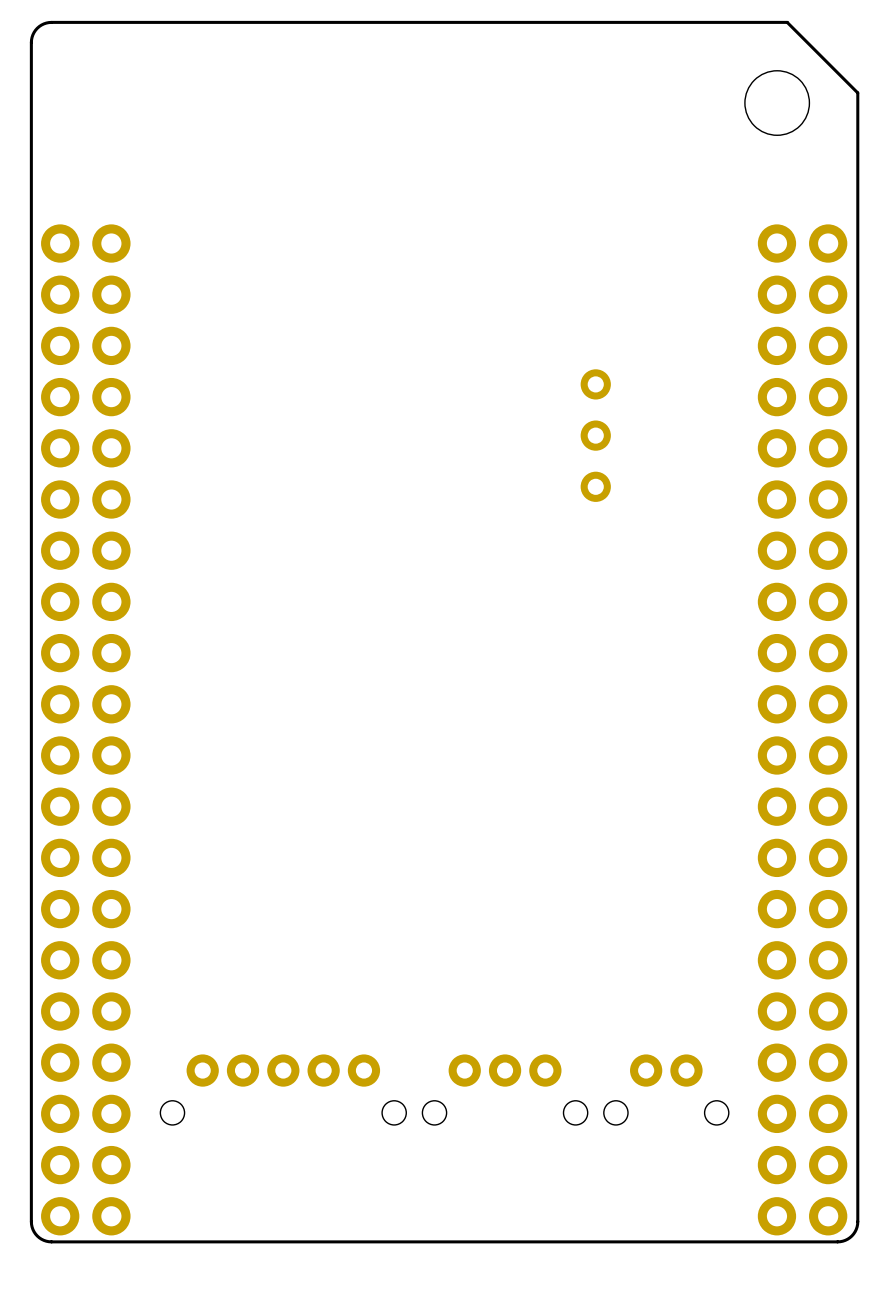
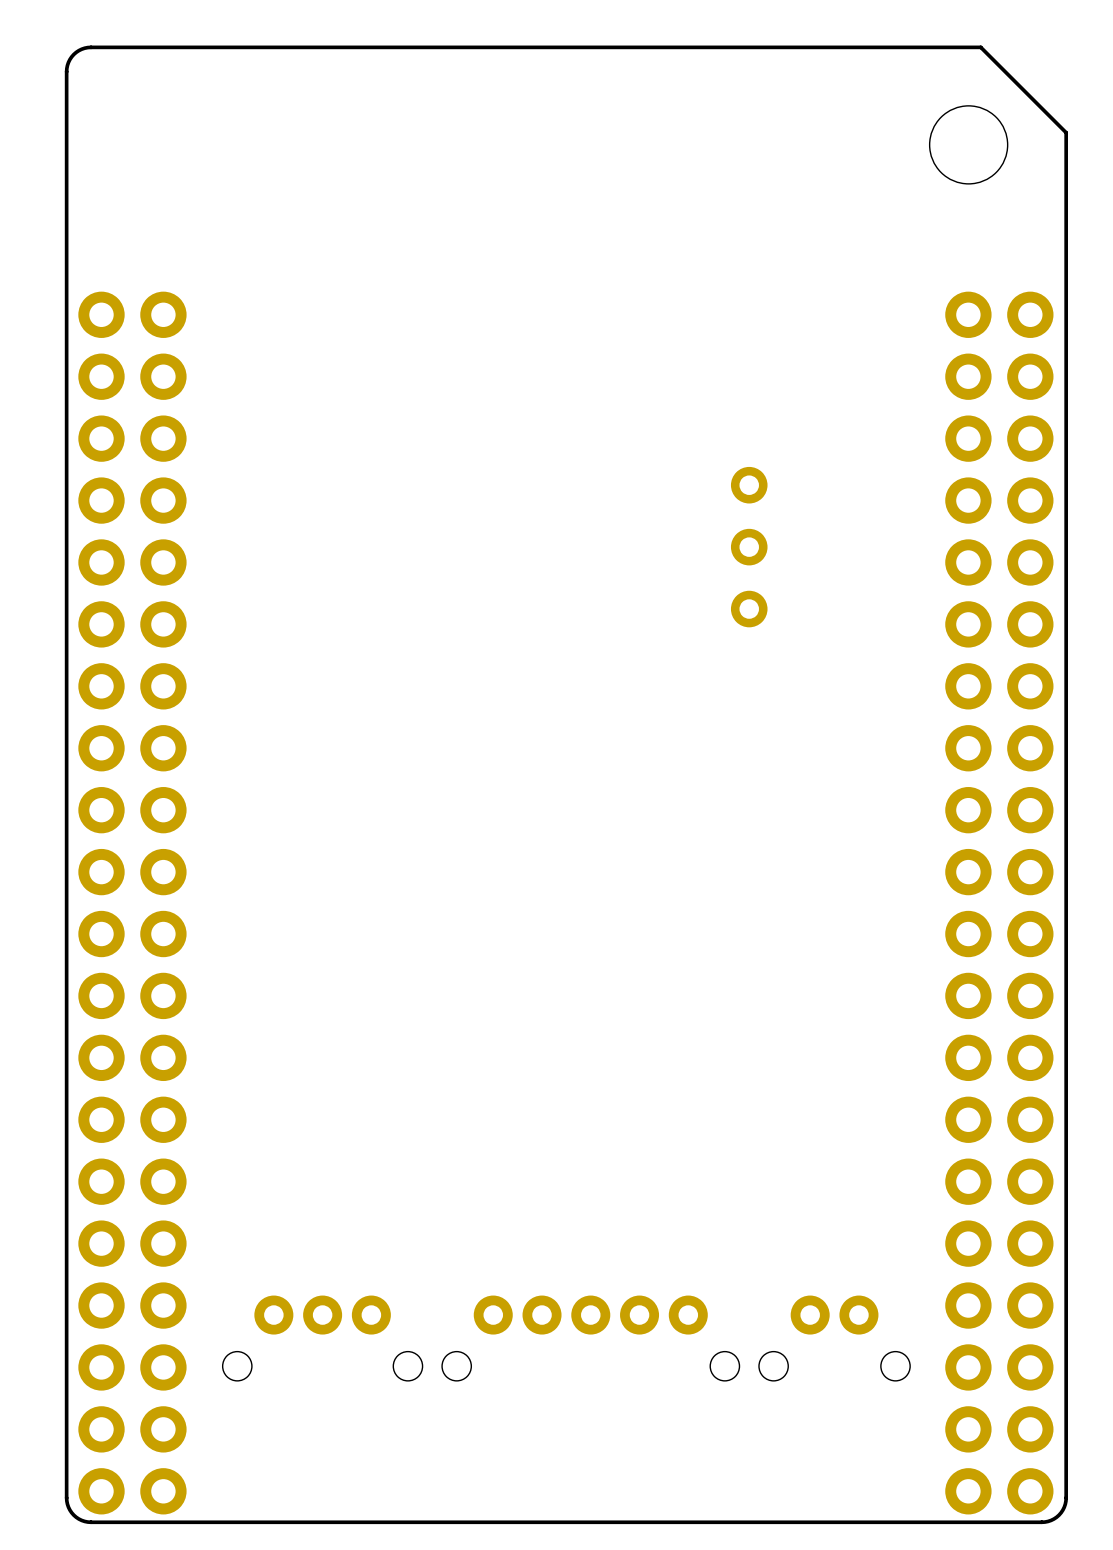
part position: (283, 1089) -> (590, 1338)
part position: (505, 1089) -> (322, 1338)

